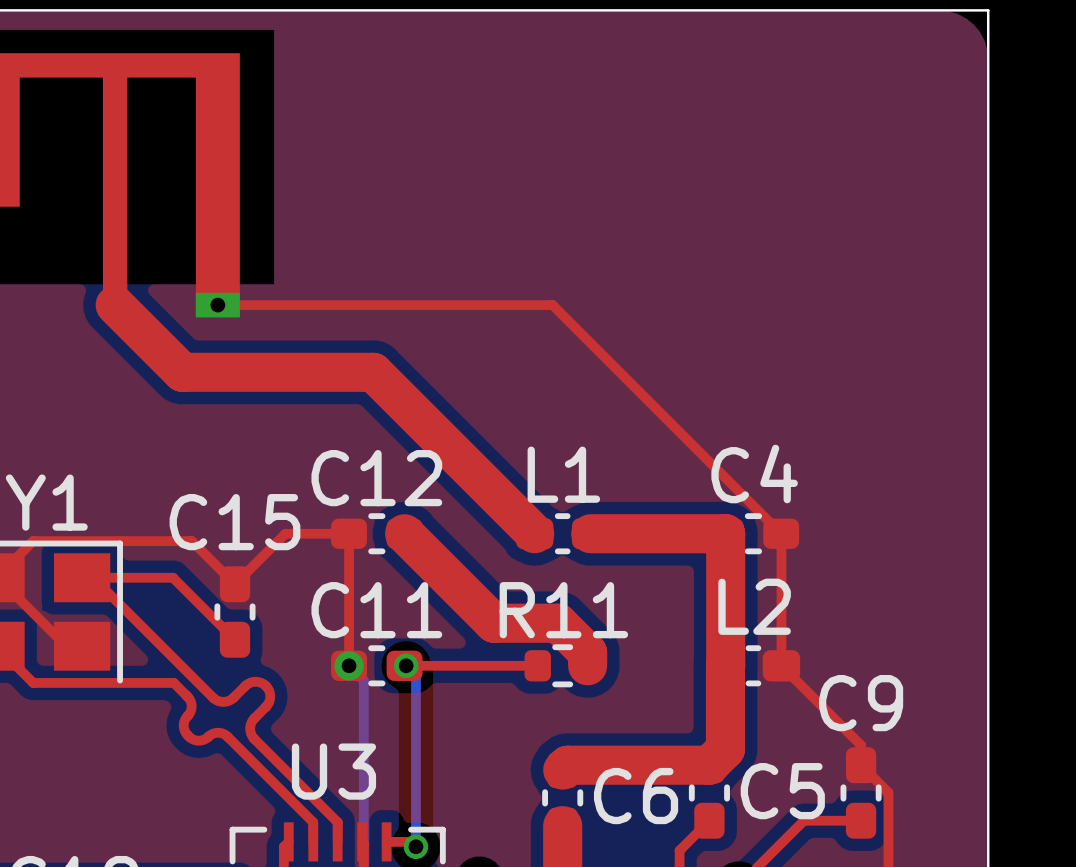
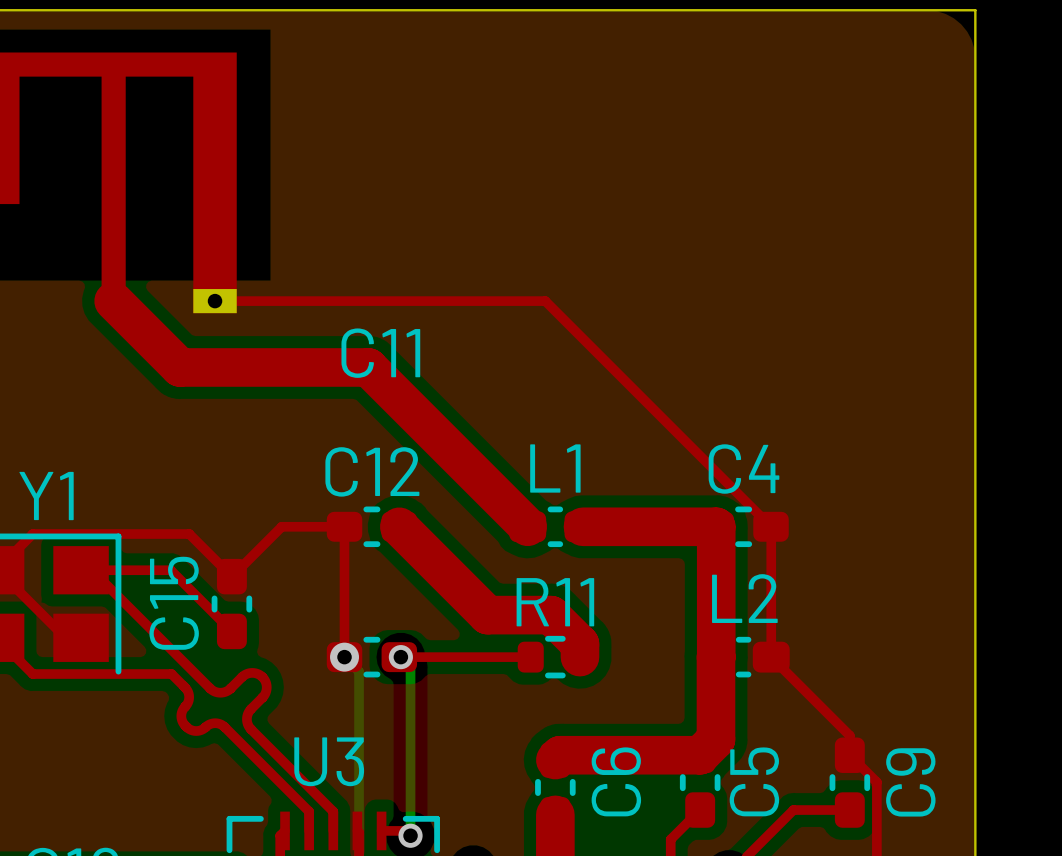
C15 name rotation: 0° (234, 522) -> 90° counterclockwise (174, 603)
C11 name position: C11 (376, 610) -> C11 (380, 353)
C9 name rotation: 0° (861, 703) -> 90° counterclockwise (910, 782)
C5 name rotation: 0° (782, 791) -> 90° counterclockwise (754, 781)
C6 name rotation: 0° (636, 796) -> 90° counterclockwise (616, 781)

